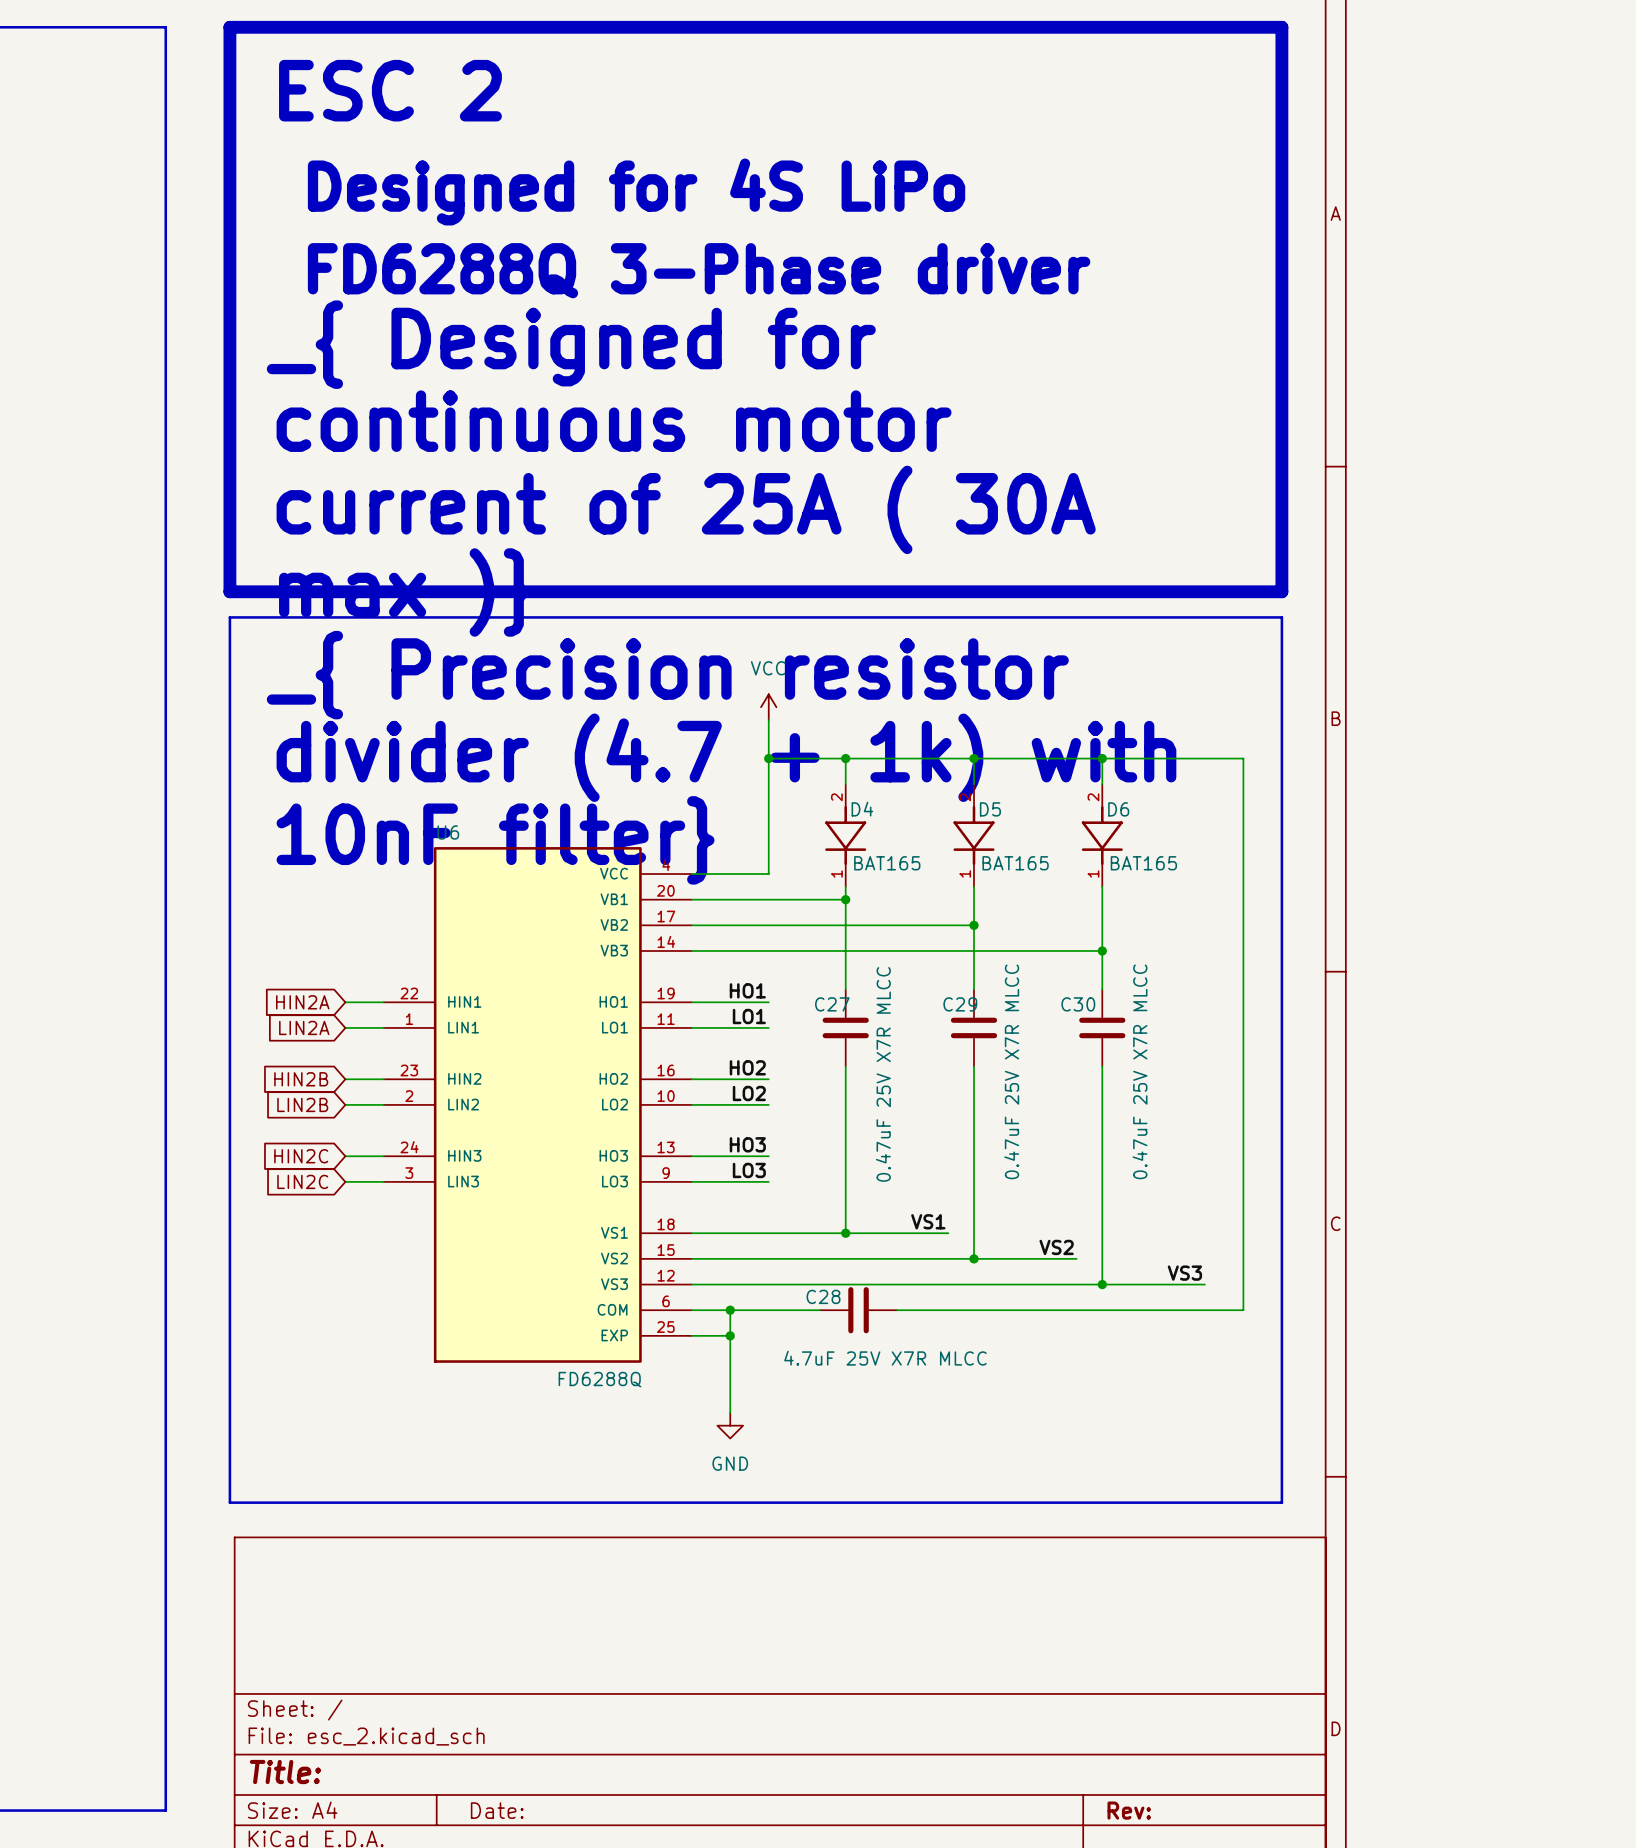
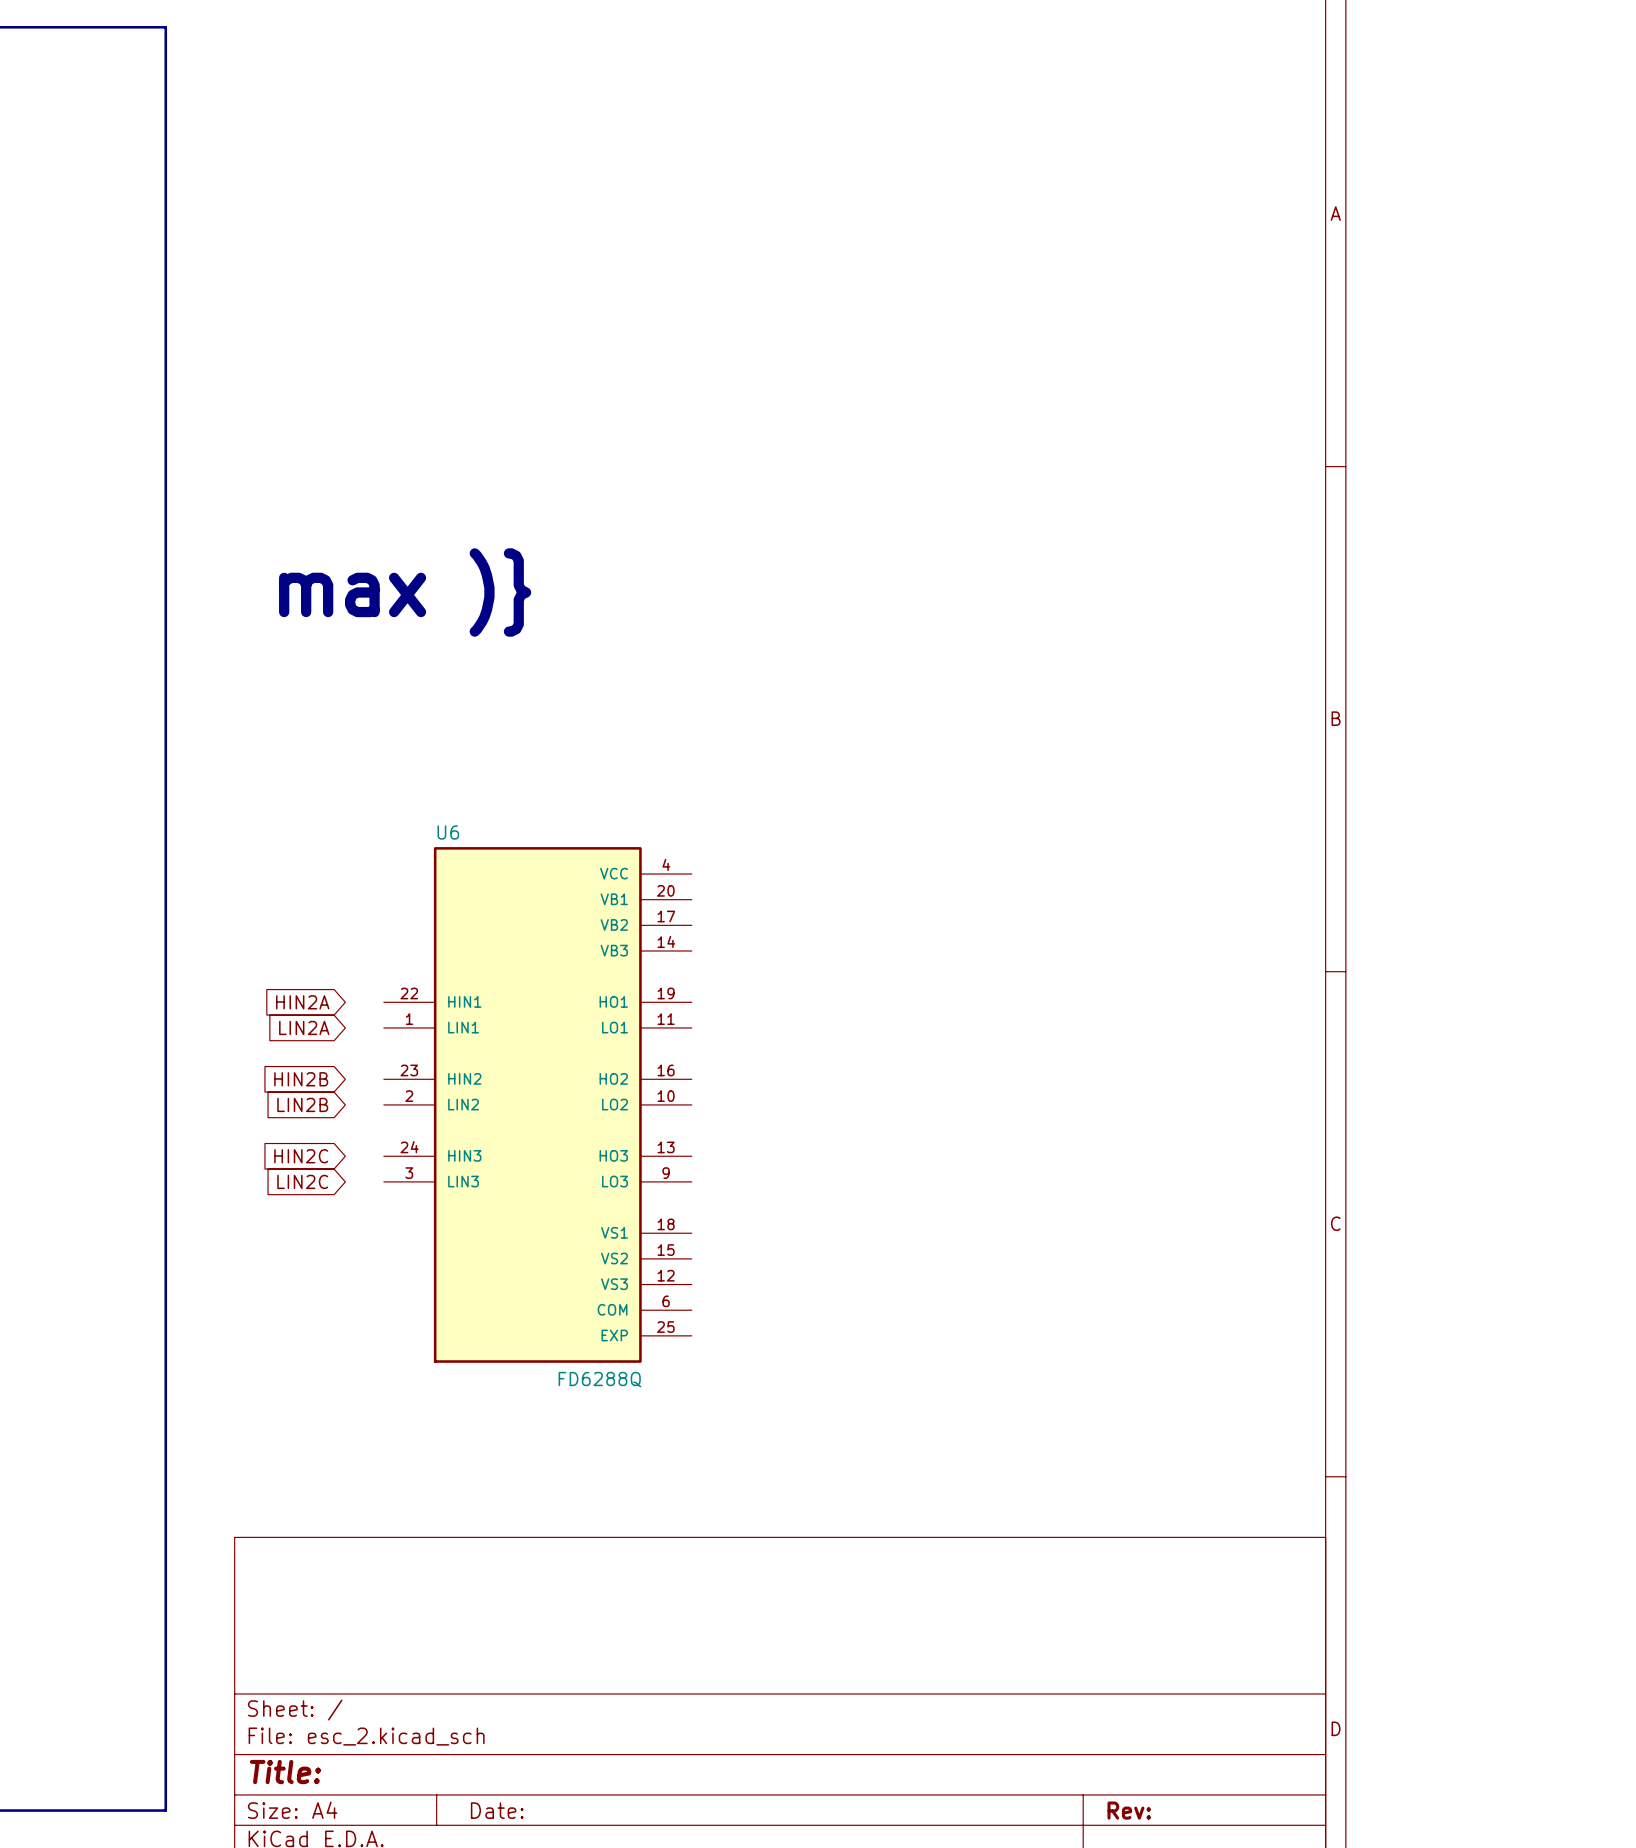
line: (229, 27) (1281, 27) (1281, 591) (229, 591) (229, 27) -> none
text: ESC 2 (390, 90) -> none
text: Designed for 4S LiPo (636, 191) -> none
text: FD6288Q 3-Phase driver (699, 270) -> none
text: _{ Designed for (571, 344) -> none
text: continuous motor (614, 421) -> none
text: current of 25A ( 30A (686, 509) -> none
line: (229, 617) (1281, 617) (1281, 1502) (229, 1502) (229, 617) -> none
text: _{ Precision resistor (667, 675) -> none
power symbol: VCC (768, 707) -> none
wire: (768, 720) (768, 874) (691, 874) -> none
text: divider (4.7 + 1k) with (726, 757) -> none
wire: (768, 758) (1243, 758) (1243, 1310) (897, 1310) -> none
junction: (768, 758) -> none
wire: (845, 758) (845, 784) -> none
junction: (845, 758) -> none
wire: (974, 758) (974, 784) -> none
junction: (974, 758) -> none
wire: (1102, 758) (1102, 784) -> none
junction: (1102, 758) -> none
D4: BAT165 (845, 835) -> none
D5: BAT165 (974, 835) -> none
D6: BAT165 (1102, 835) -> none
text: 10nF filter} (495, 840) -> none
wire: (845, 886) (845, 989) -> none
wire: (974, 886) (974, 989) -> none
wire: (1102, 886) (1102, 989) -> none
wire: (691, 899) (845, 899) -> none
junction: (845, 899) -> none
wire: (691, 925) (974, 925) -> none
junction: (974, 925) -> none
wire: (691, 950) (1102, 950) -> none
junction: (1102, 950) -> none
label: HO1 (747, 990) -> none
wire: (345, 1002) (383, 1002) -> none
wire: (691, 1002) (768, 1002) -> none
label: LO1 (749, 1016) -> none
wire: (345, 1027) (383, 1027) -> none
wire: (691, 1027) (768, 1027) -> none
C27: 0.47uF 25V X7R MLCC (845, 1027) -> none
C29: 0.47uF 25V X7R MLCC (974, 1027) -> none
C30: 0.47uF 25V X7R MLCC (1102, 1027) -> none
wire: (845, 1066) (845, 1233) -> none
wire: (974, 1066) (974, 1258) -> none
wire: (1102, 1066) (1102, 1284) -> none
label: HO2 (747, 1067) -> none
wire: (345, 1079) (383, 1079) -> none
wire: (691, 1079) (768, 1079) -> none
label: LO2 (749, 1093) -> none
wire: (345, 1104) (383, 1104) -> none
wire: (691, 1104) (768, 1104) -> none
label: HO3 (747, 1144) -> none
wire: (345, 1156) (383, 1156) -> none
wire: (691, 1156) (768, 1156) -> none
label: LO3 (749, 1170) -> none
wire: (345, 1181) (383, 1181) -> none
wire: (691, 1181) (768, 1181) -> none
label: VS1 (928, 1221) -> none
wire: (691, 1233) (948, 1233) -> none
junction: (845, 1233) -> none
label: VS2 (1056, 1247) -> none
wire: (691, 1258) (1076, 1258) -> none
junction: (974, 1258) -> none
label: VS3 (1184, 1273) -> none
wire: (691, 1284) (1204, 1284) -> none
junction: (1102, 1284) -> none
wire: (691, 1310) (820, 1310) -> none
wire: (730, 1310) (730, 1412) -> none
junction: (730, 1310) -> none
C28: 4.7uF 25V X7R MLCC (858, 1310) -> none
wire: (691, 1335) (730, 1335) -> none
junction: (730, 1335) -> none
power symbol: GND (730, 1425) -> none

